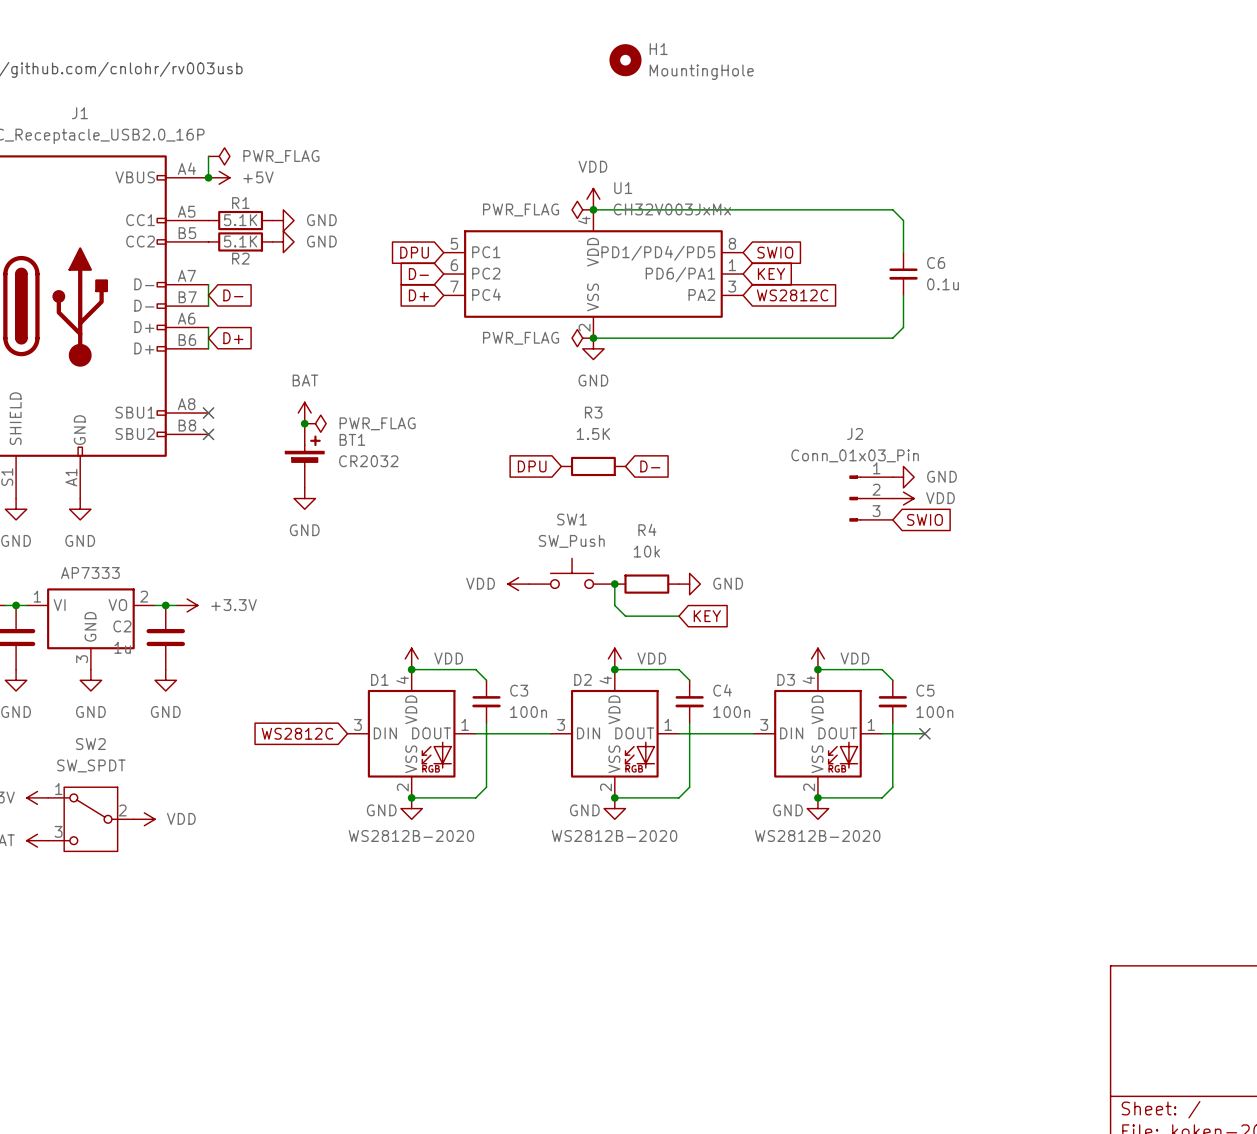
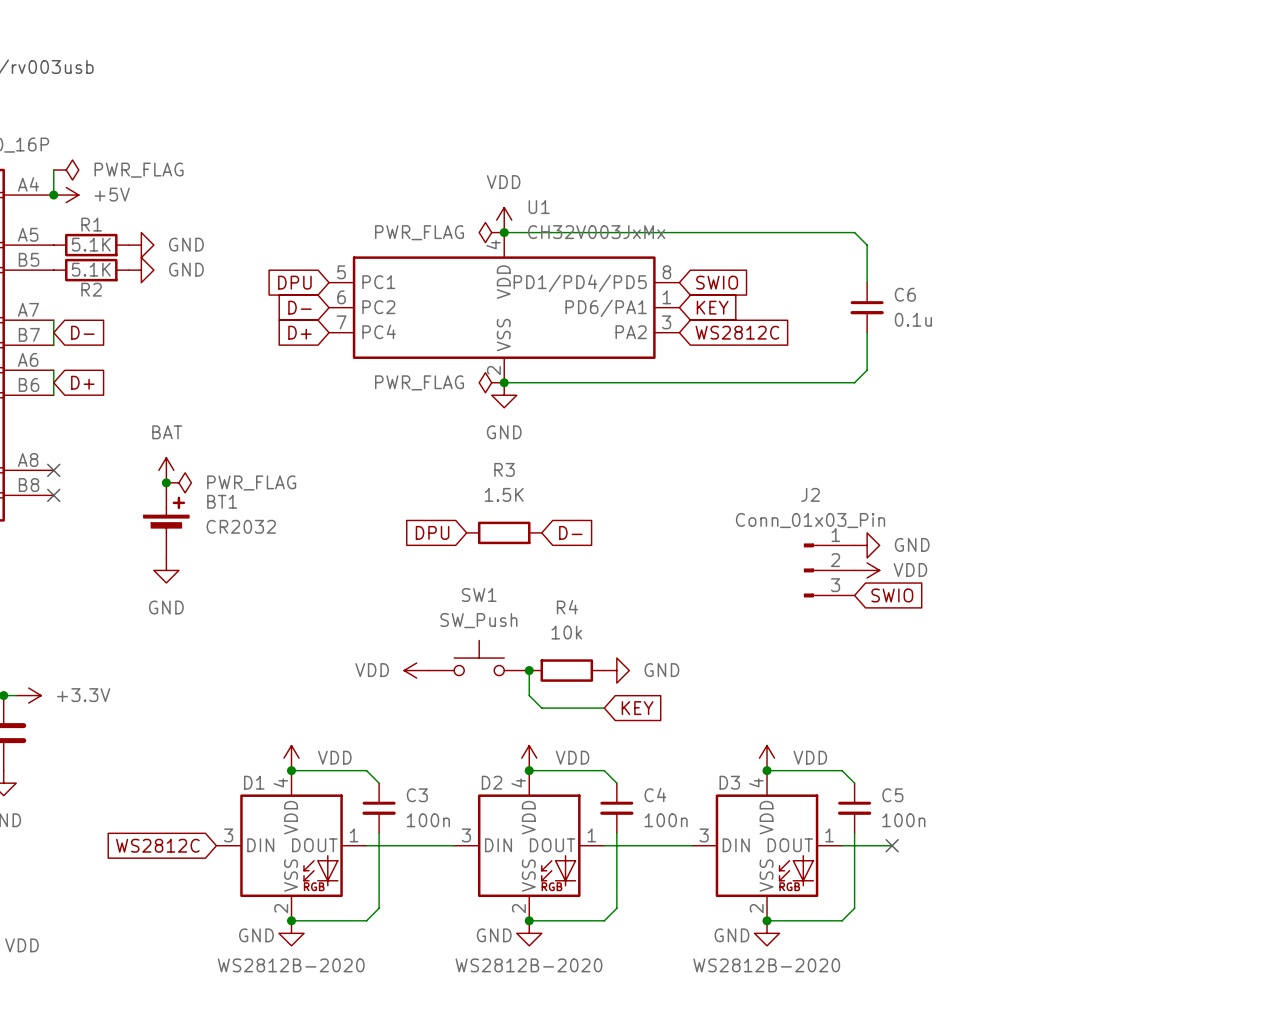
H1: MountingHole (625, 60) -> none

